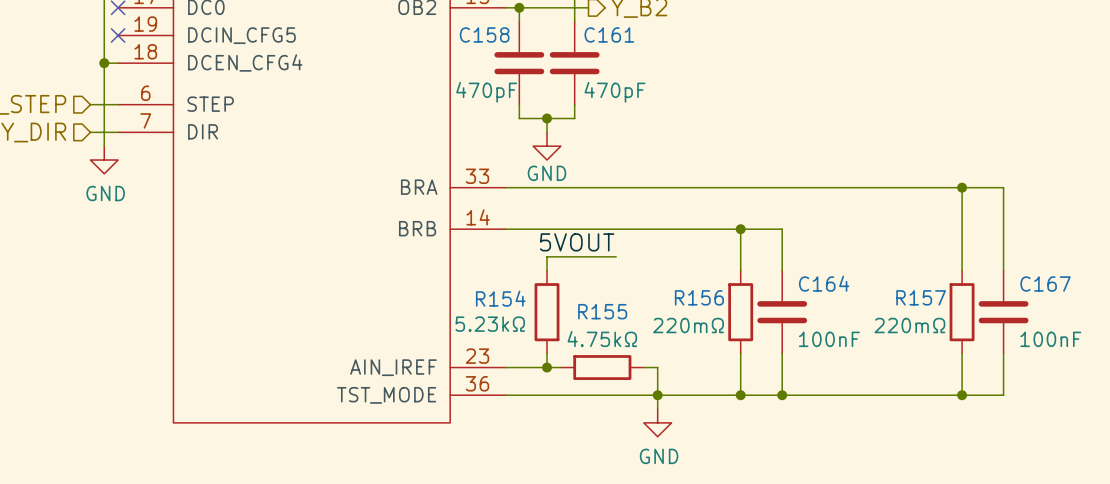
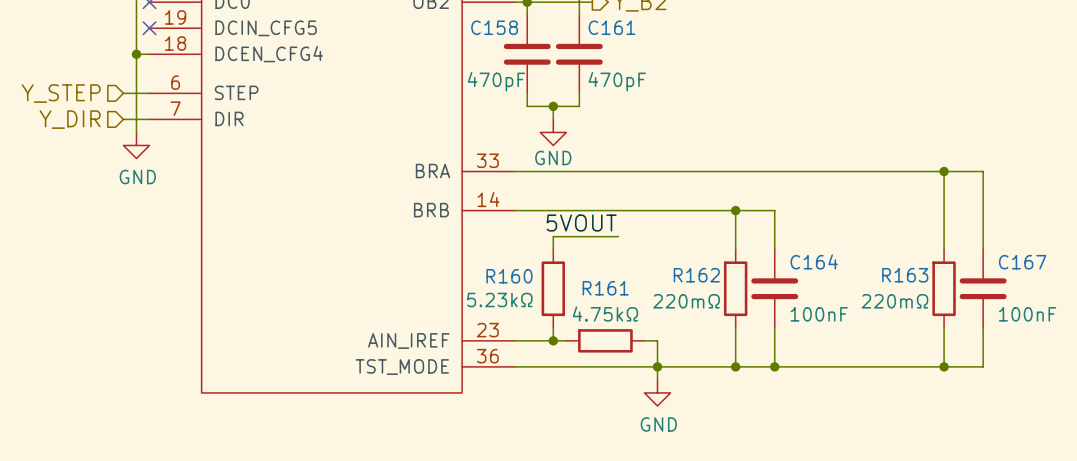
R156 name: R156 (699, 297) -> R162 (696, 275)
R157 name: R157 (921, 297) -> R163 (905, 275)
R154 name: R154 (500, 298) -> R160 (509, 276)
R155 name: R155 (602, 311) -> R161 (605, 288)

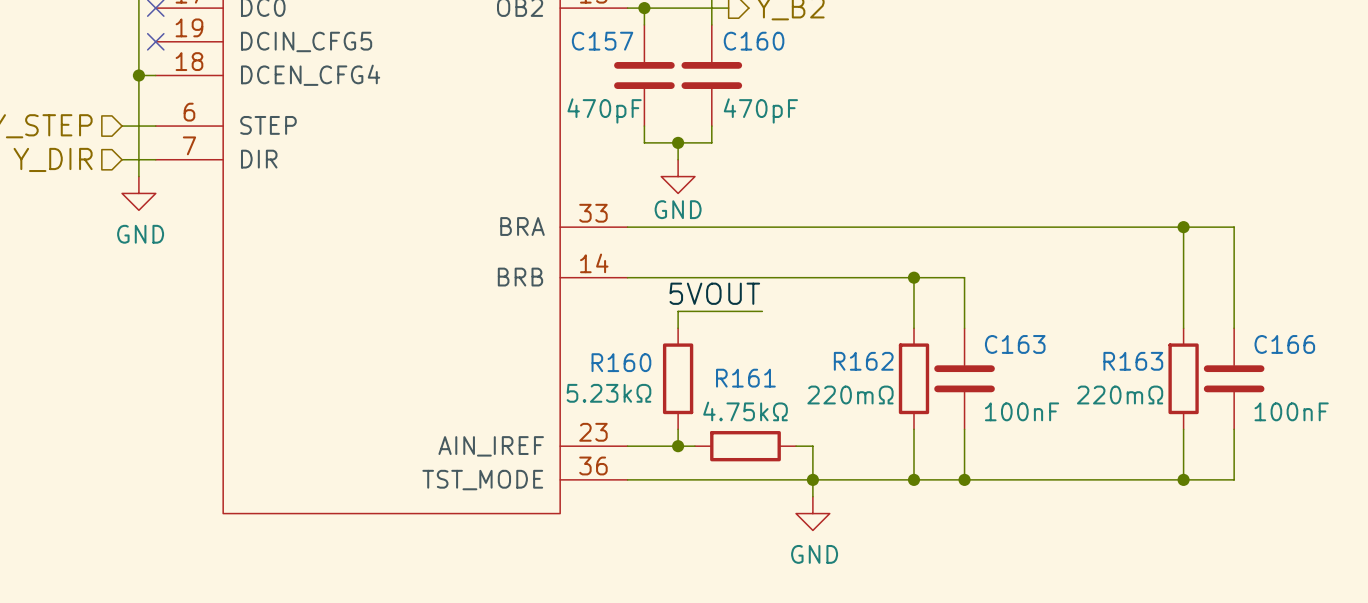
C158 name: C158 (494, 27) -> C157 (602, 41)
C161 name: C161 (612, 27) -> C160 (754, 41)
C164 name: C164 (814, 261) -> C163 (1015, 344)
C167 name: C167 (1022, 262) -> C166 (1284, 344)

